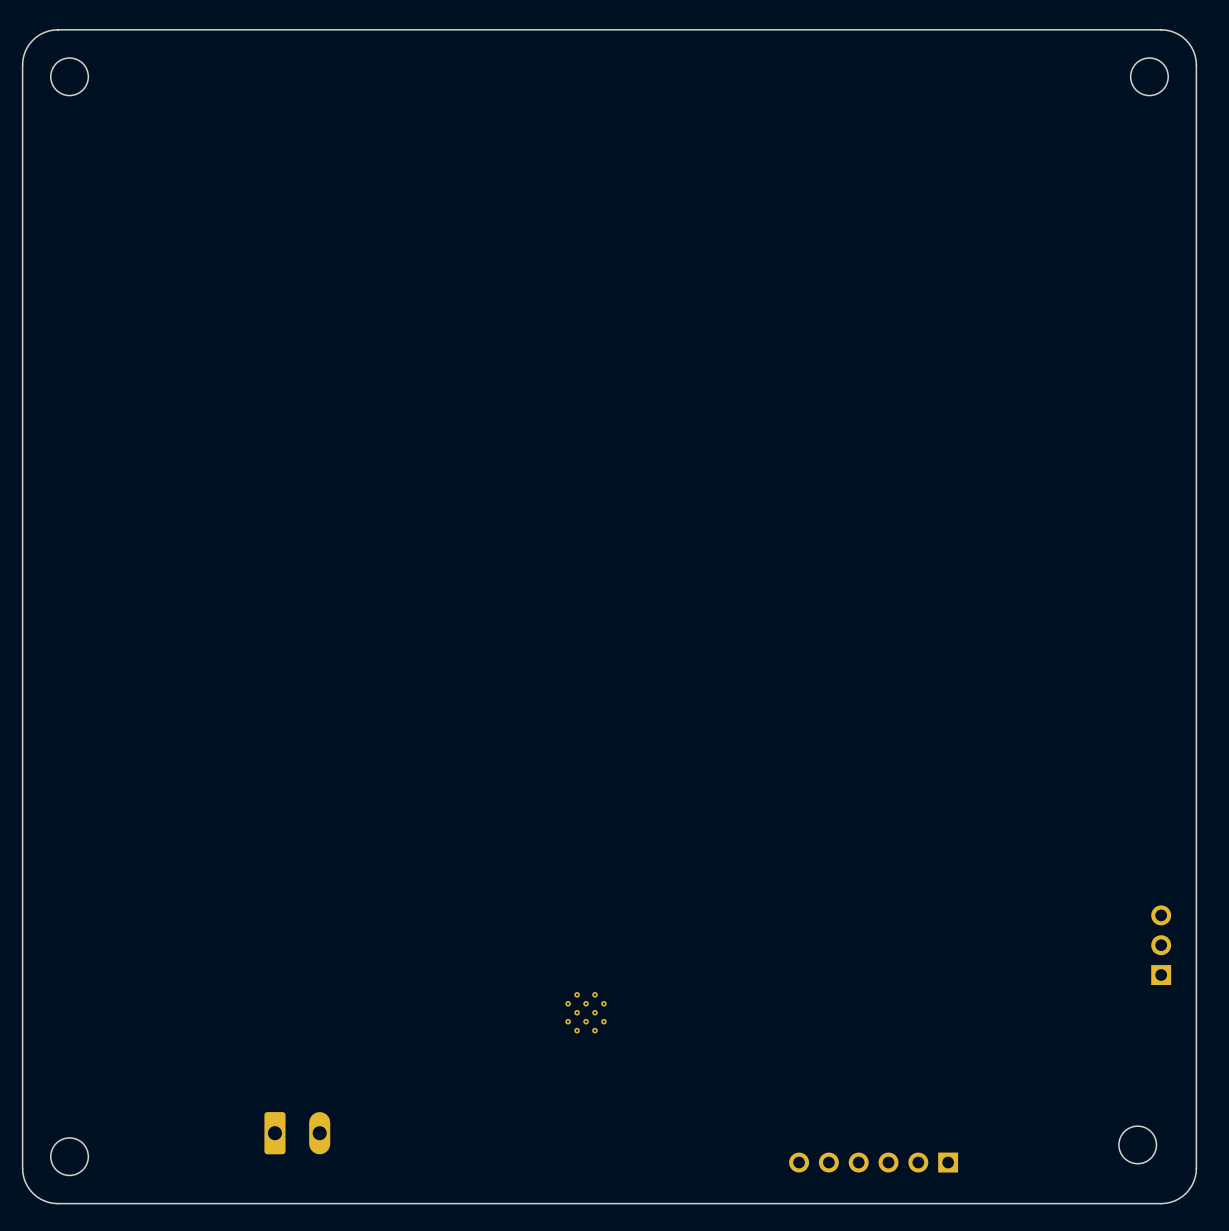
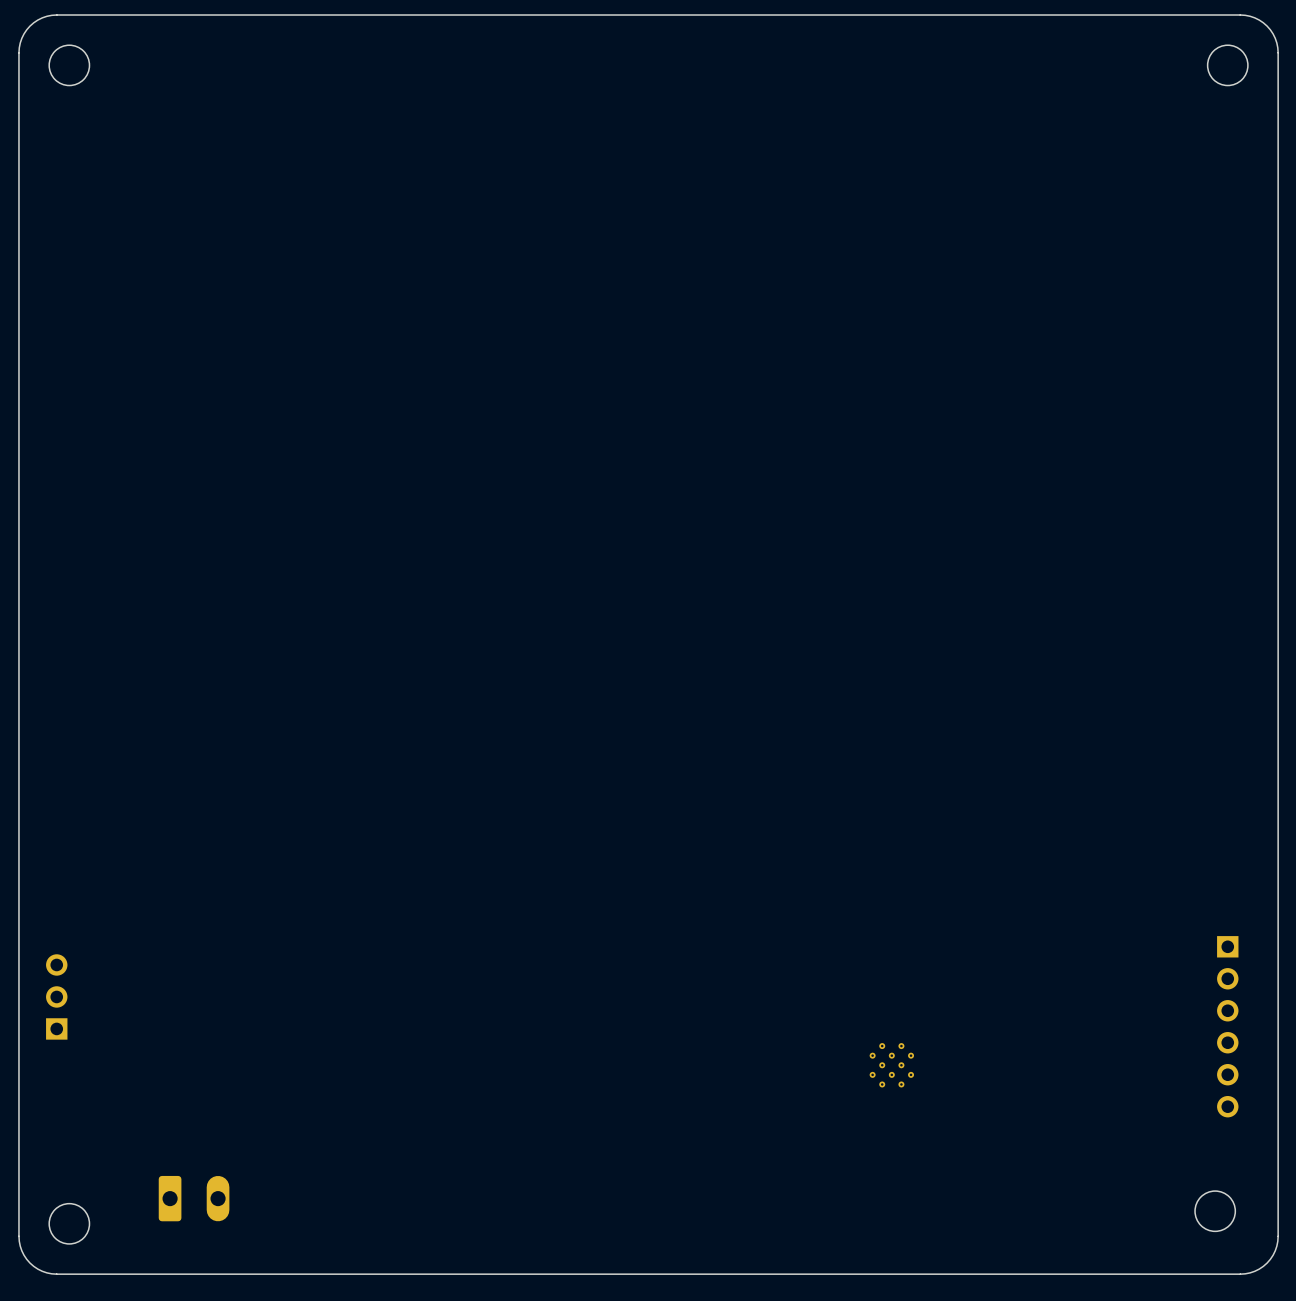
part: none -> (56, 996)
part: (1161, 945) -> none
part: none -> (1227, 1026)
part position: (586, 1012) -> (891, 1065)
part position: (297, 1133) -> (194, 1198)
part: (873, 1162) -> none

